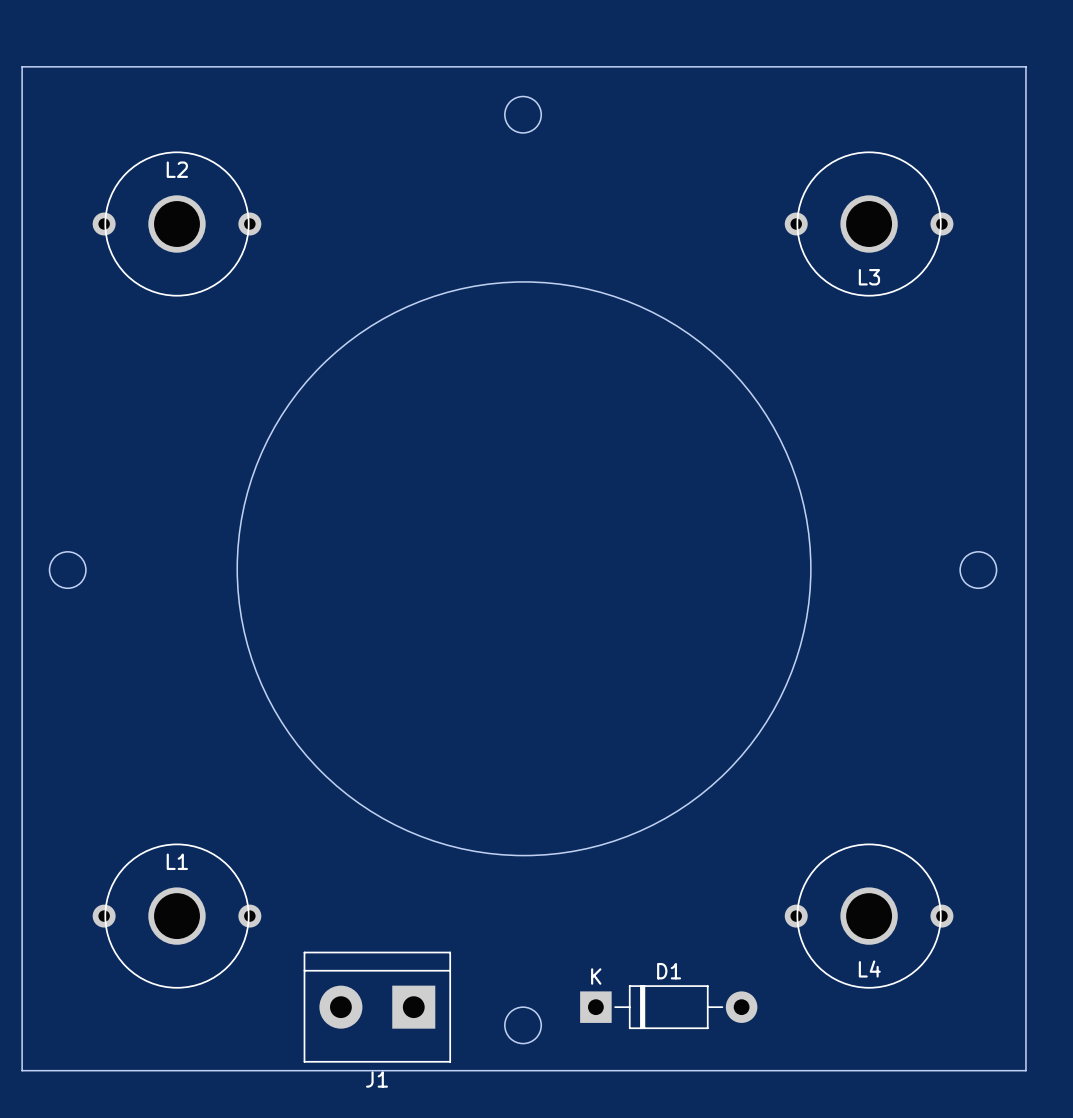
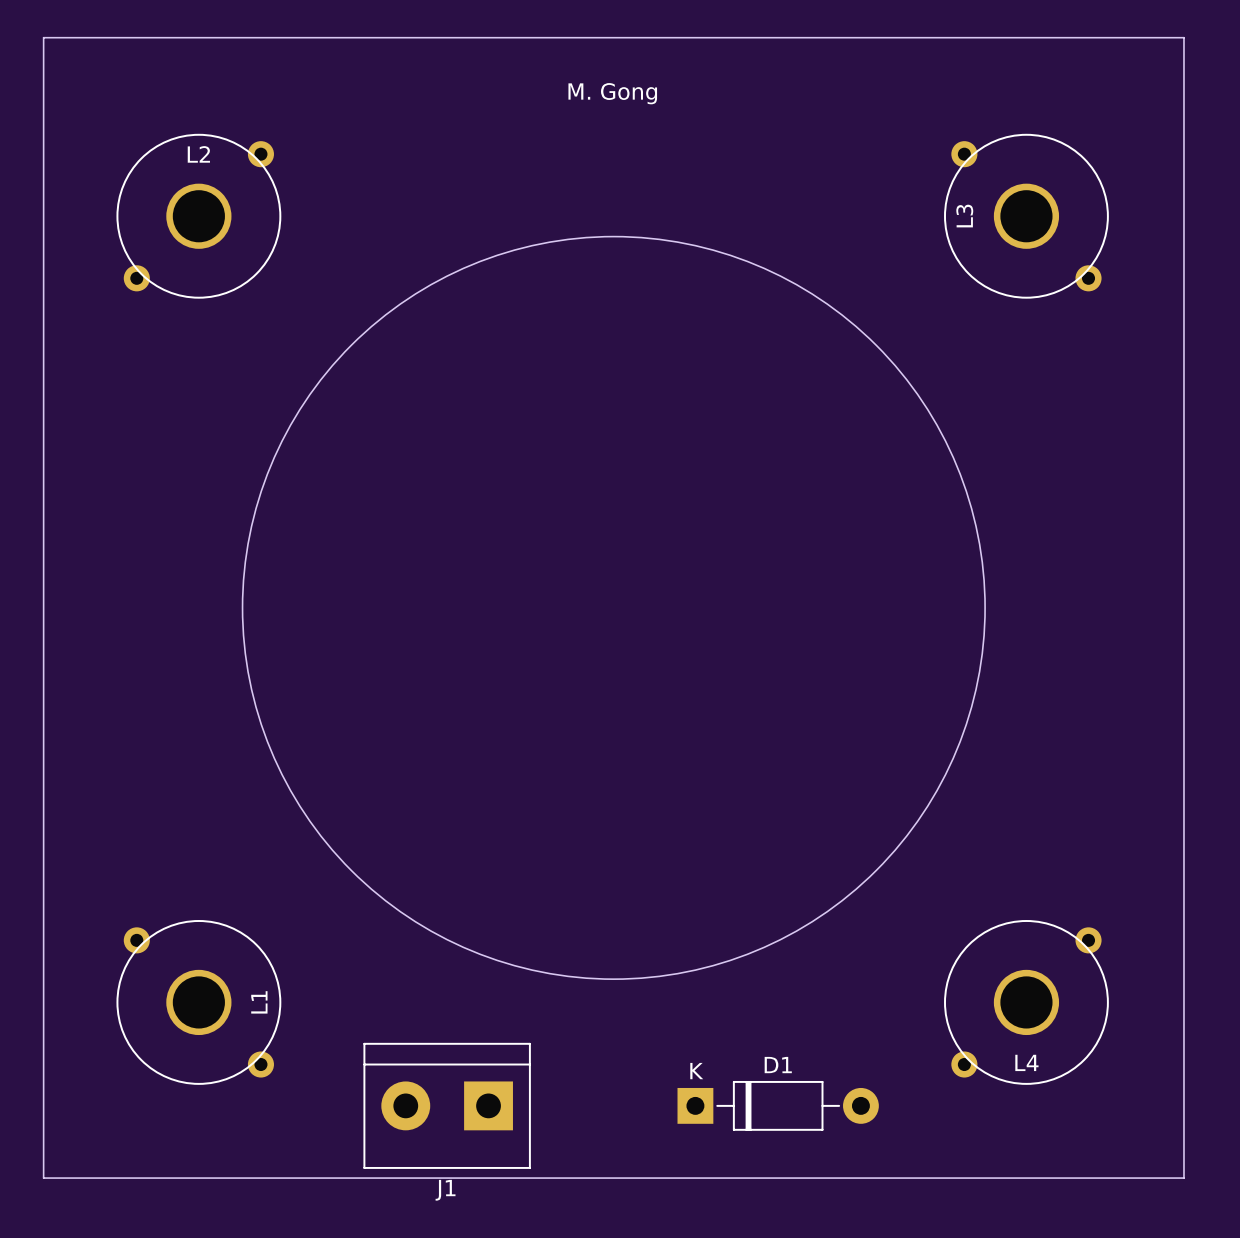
round board edge: [504, 95, 542, 134] -> none
text: none -> M. Gong (612, 93)
L2 footprint: [92, 151, 262, 297] -> [116, 133, 282, 299]
L3 footprint: [784, 151, 954, 297] -> [944, 133, 1109, 299]
L3 name position: L3 (869, 277) -> L3 (964, 216)
round board edge size: [236, 281, 812, 857] -> [241, 235, 986, 980]
round board edge: [48, 551, 87, 589] -> none
round board edge: [959, 551, 998, 589] -> none
L1 footprint: [92, 843, 262, 989] -> [116, 920, 282, 1085]
L4 footprint: [784, 843, 954, 989] -> [944, 920, 1109, 1085]
L1 name position: L1 (177, 861) -> L1 (259, 1002)
round board edge: [504, 1006, 542, 1045] -> none

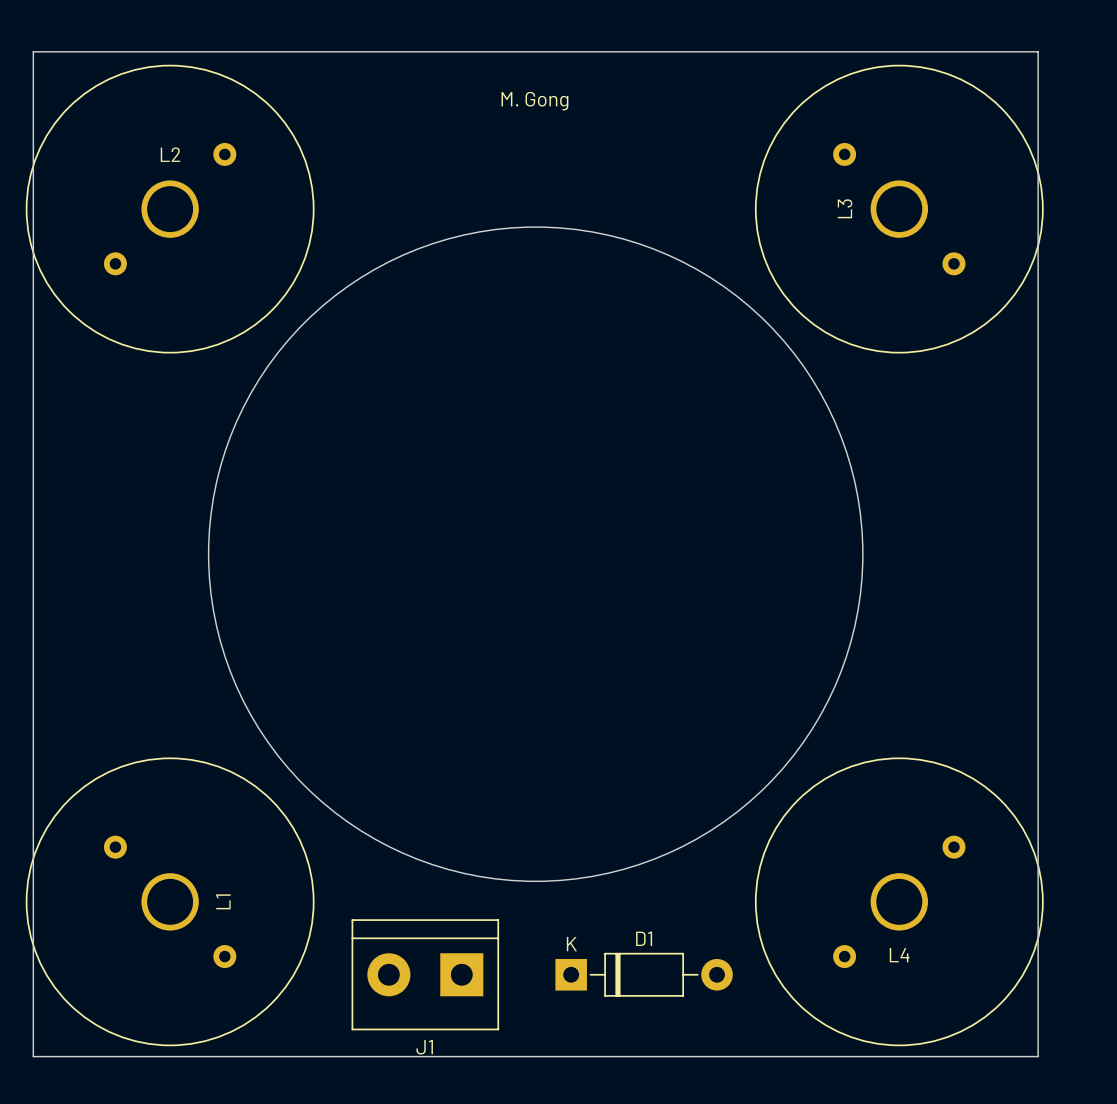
L2 footprint: [116, 133, 282, 299] -> [25, 64, 315, 354]
L3 footprint: [944, 133, 1109, 299] -> [754, 64, 1044, 354]
L1 footprint: [116, 920, 282, 1085] -> [25, 757, 315, 1047]
L4 footprint: [944, 920, 1109, 1085] -> [754, 757, 1044, 1047]
J1 position: (447, 1105) -> (425, 974)
D1 position: (778, 1105) -> (644, 974)

